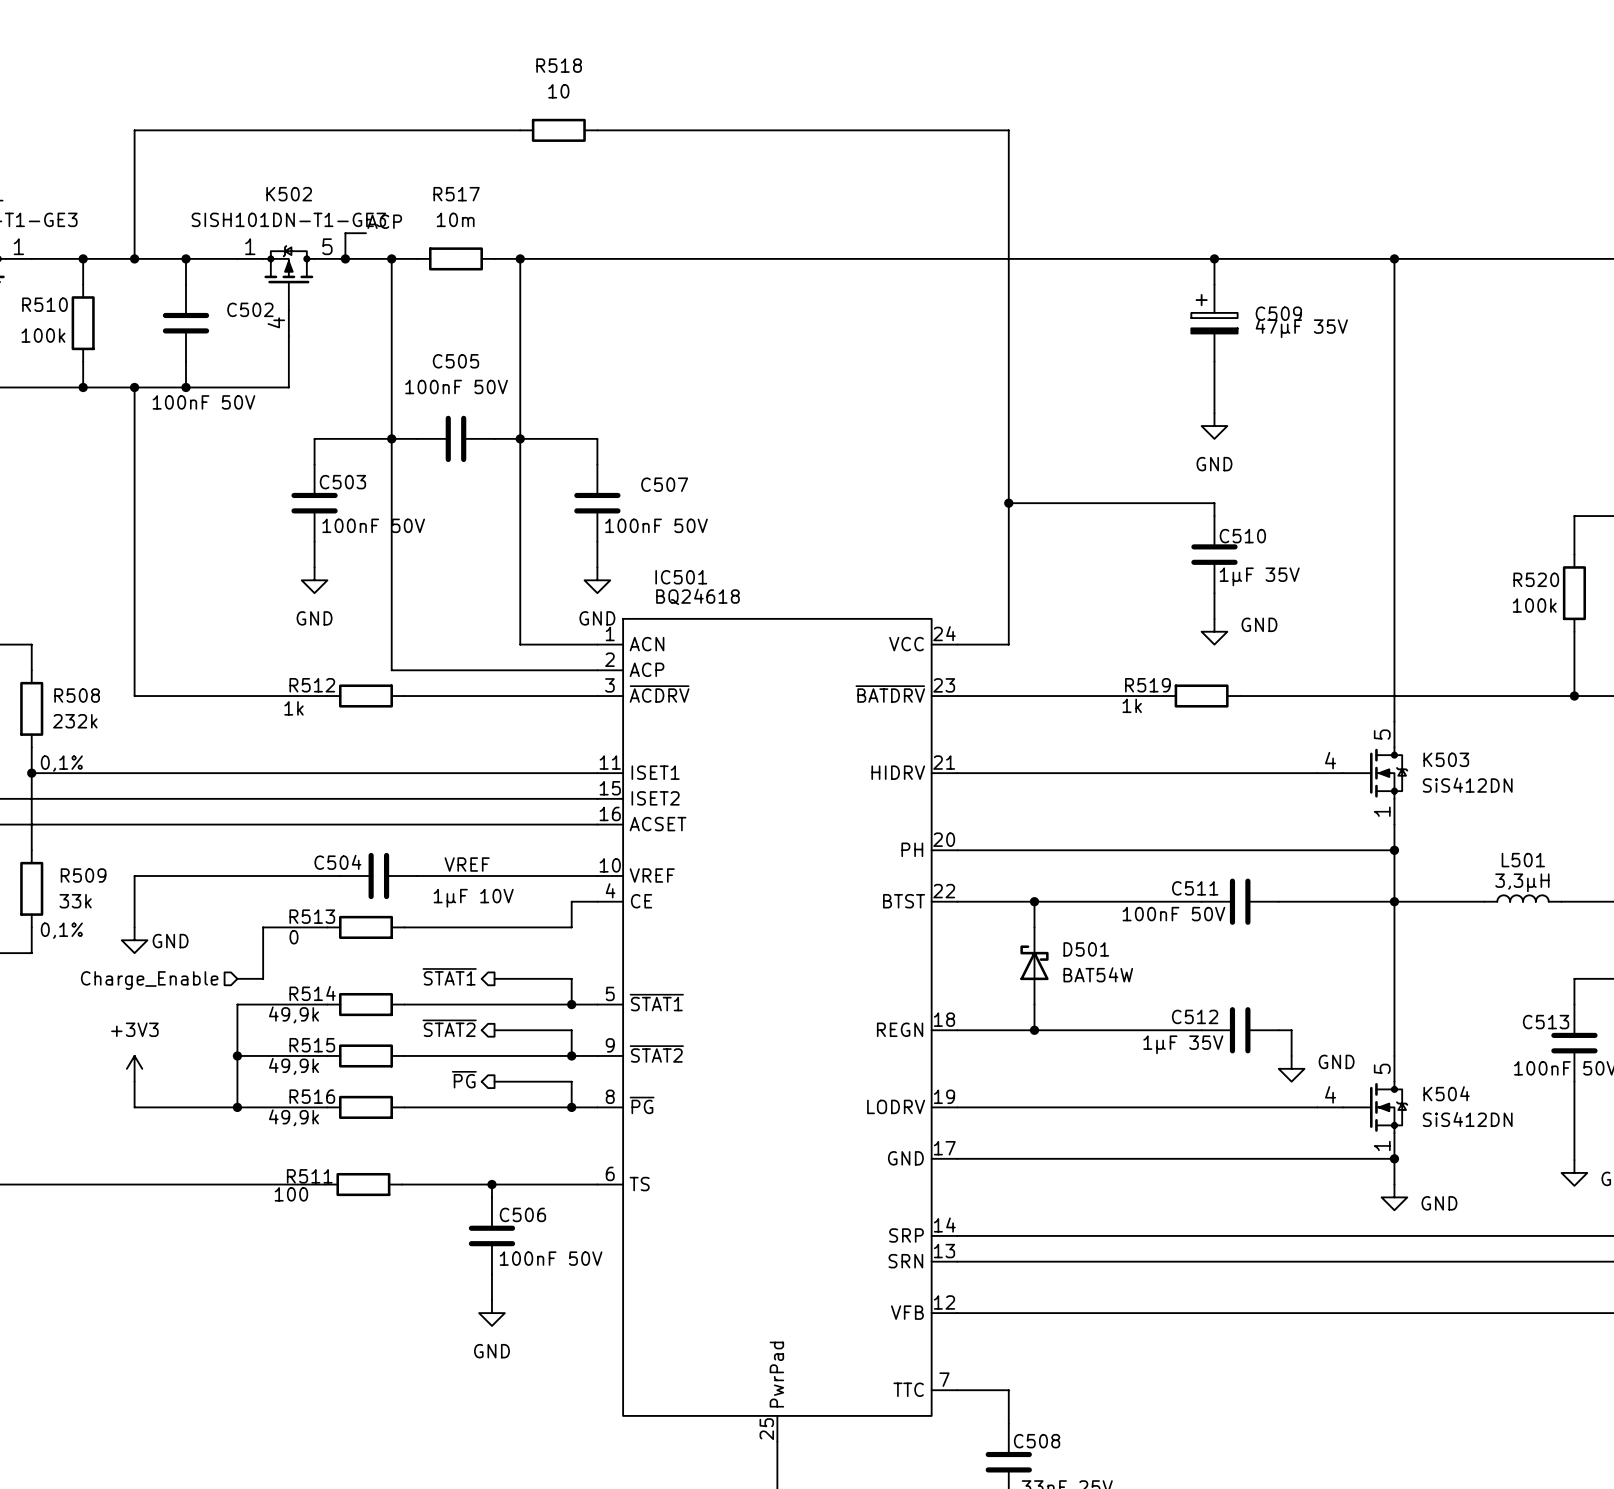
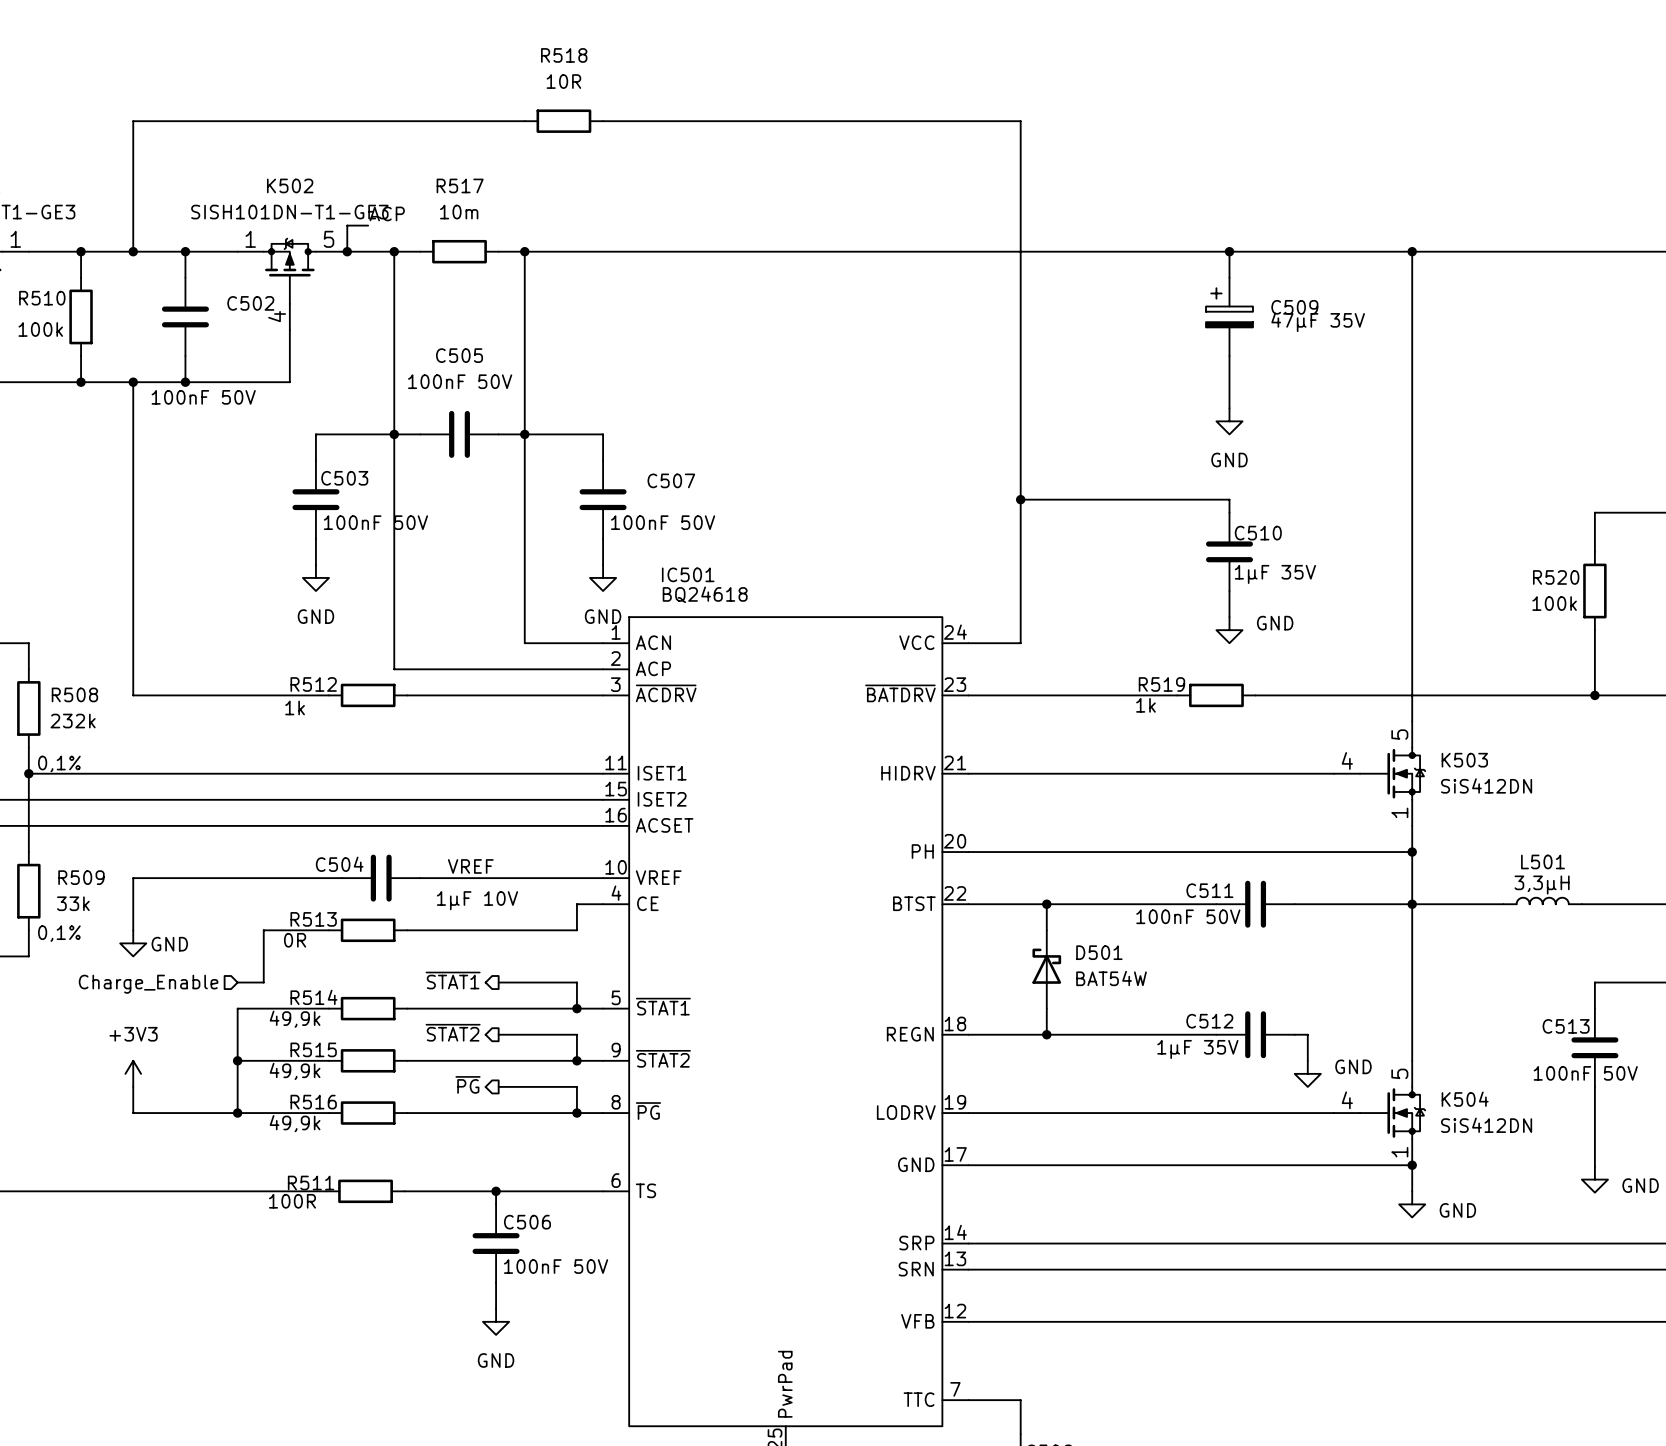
R518 value: 10 (558, 91) -> 10R (563, 81)
R513 value: 0 (294, 937) -> 0R (295, 940)
R511 value: 100 (291, 1194) -> 100R (292, 1201)

